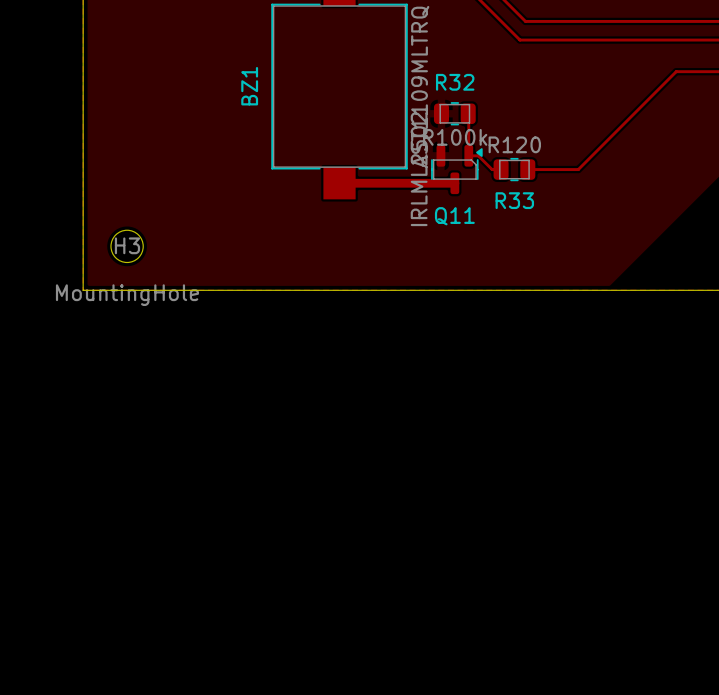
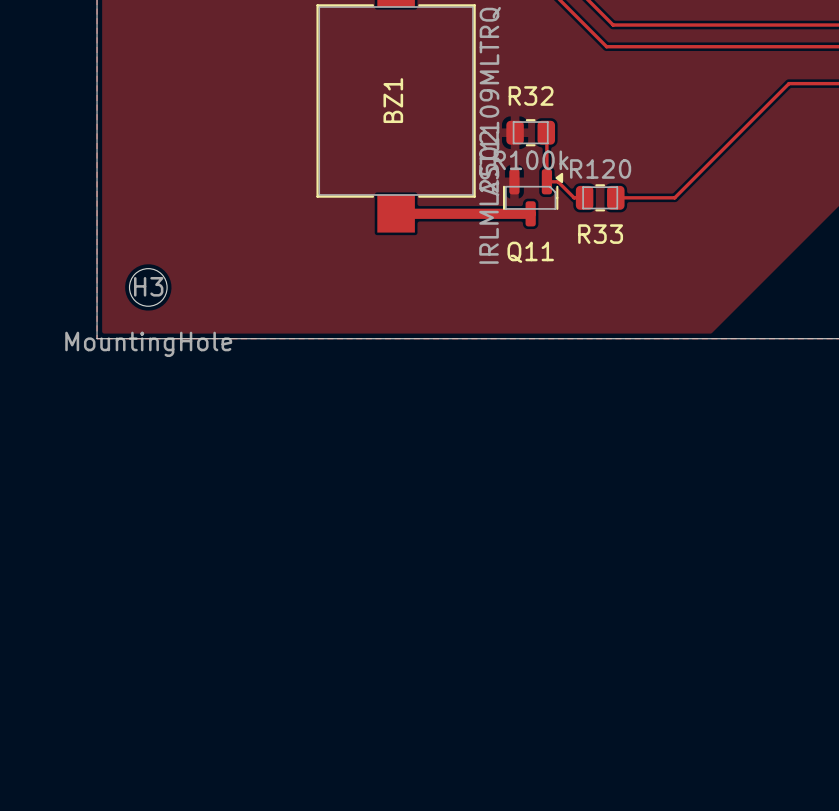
BZ1 name position: BZ1 (249, 86) -> BZ1 (393, 100)

